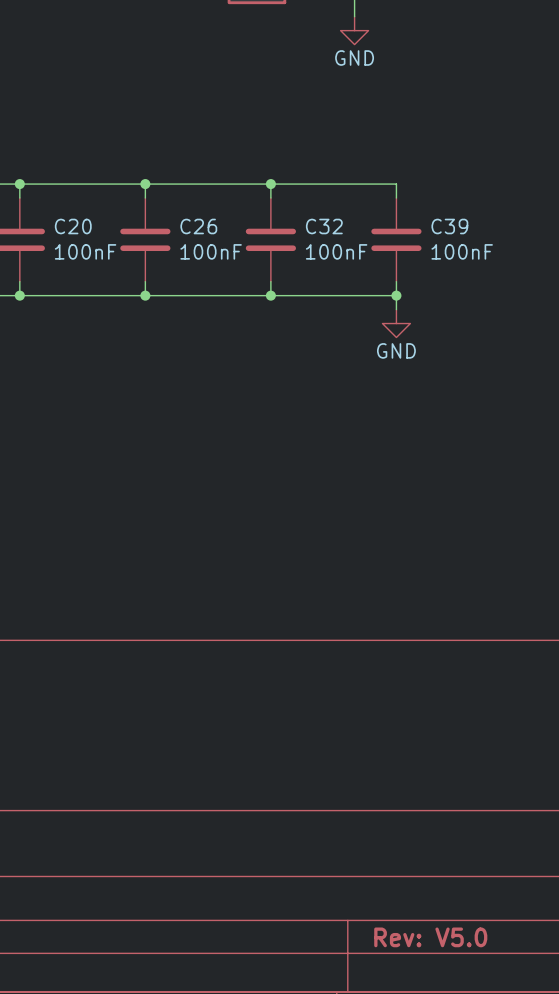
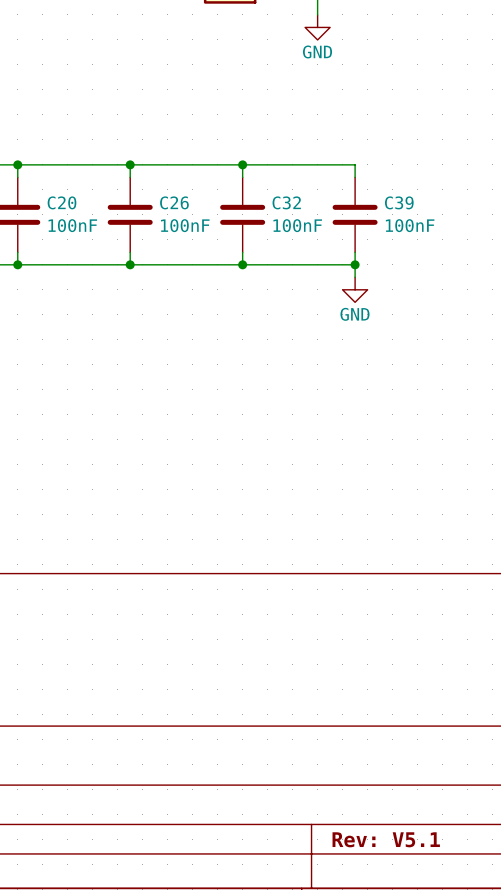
title block: Rev: V5.0 (430, 937) -> Rev: V5.1 (386, 839)

